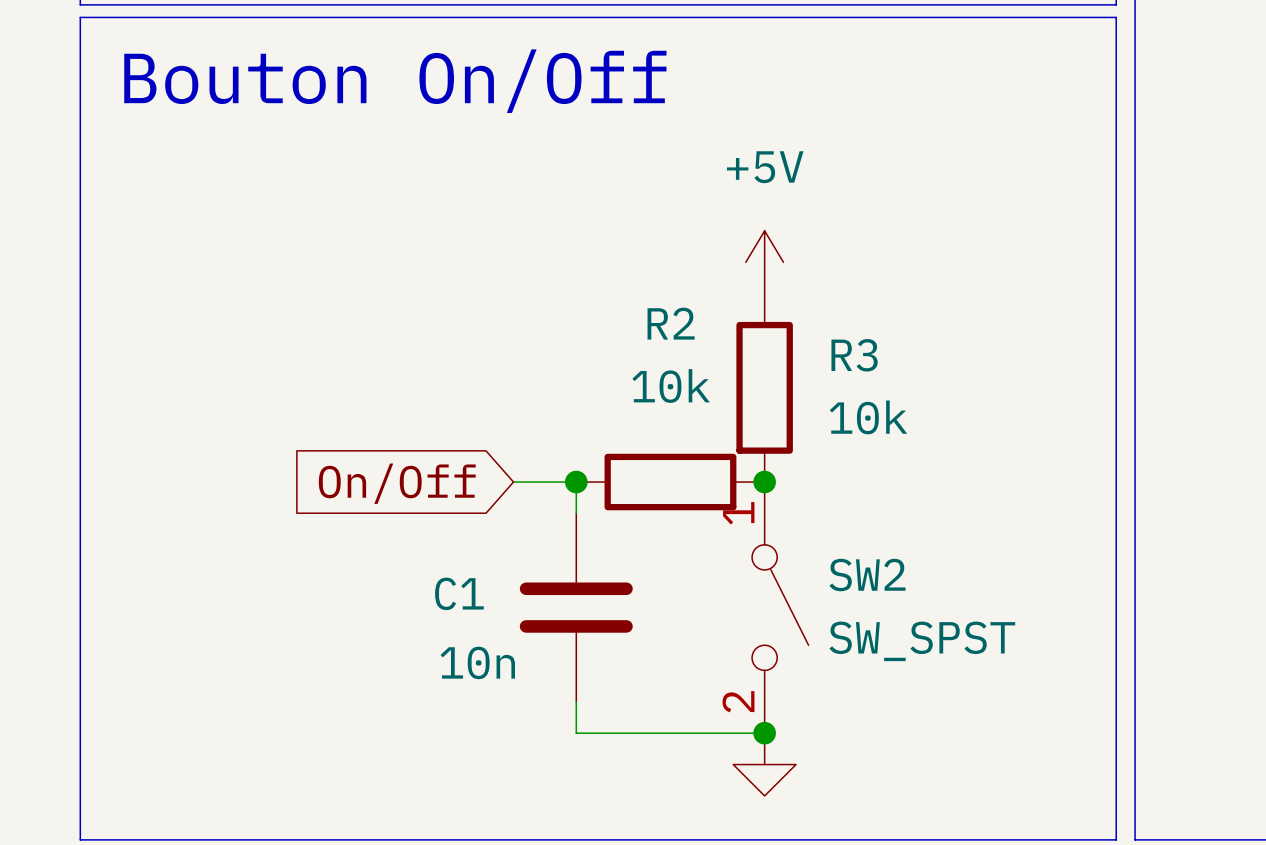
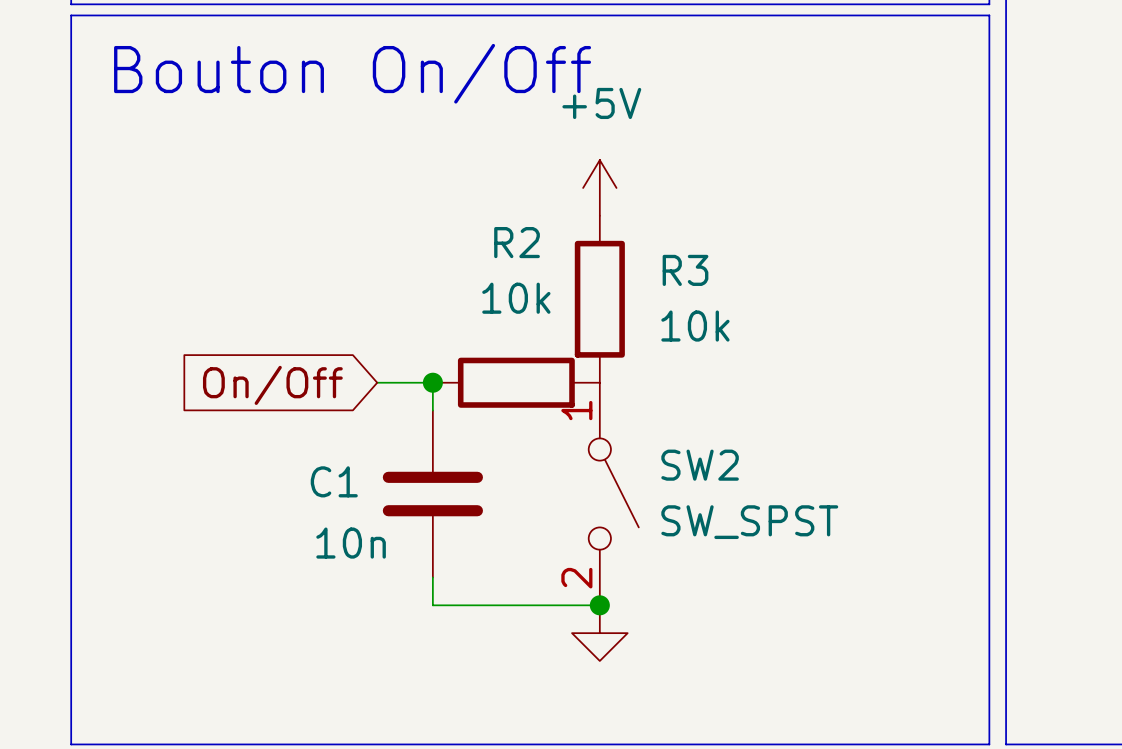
power symbol position: +5V (764, 262) -> +5V (599, 187)
R3 position: (764, 387) -> (599, 299)
wire: (513, 482) (576, 482) (576, 513) -> (377, 382) (432, 382) (432, 410)
junction position: (576, 482) -> (432, 382)
R2 position: (670, 482) -> (516, 382)
junction: (764, 482) -> none
global label position: On/Off (397, 483) -> On/Off (272, 385)
C1 position: (576, 607) -> (432, 494)
SW2 position: (780, 607) -> (613, 494)
wire: (576, 701) (576, 733) (764, 733) -> (432, 577) (432, 605) (599, 605)
junction position: (764, 733) -> (599, 605)
power symbol position: (764, 764) -> (599, 633)

